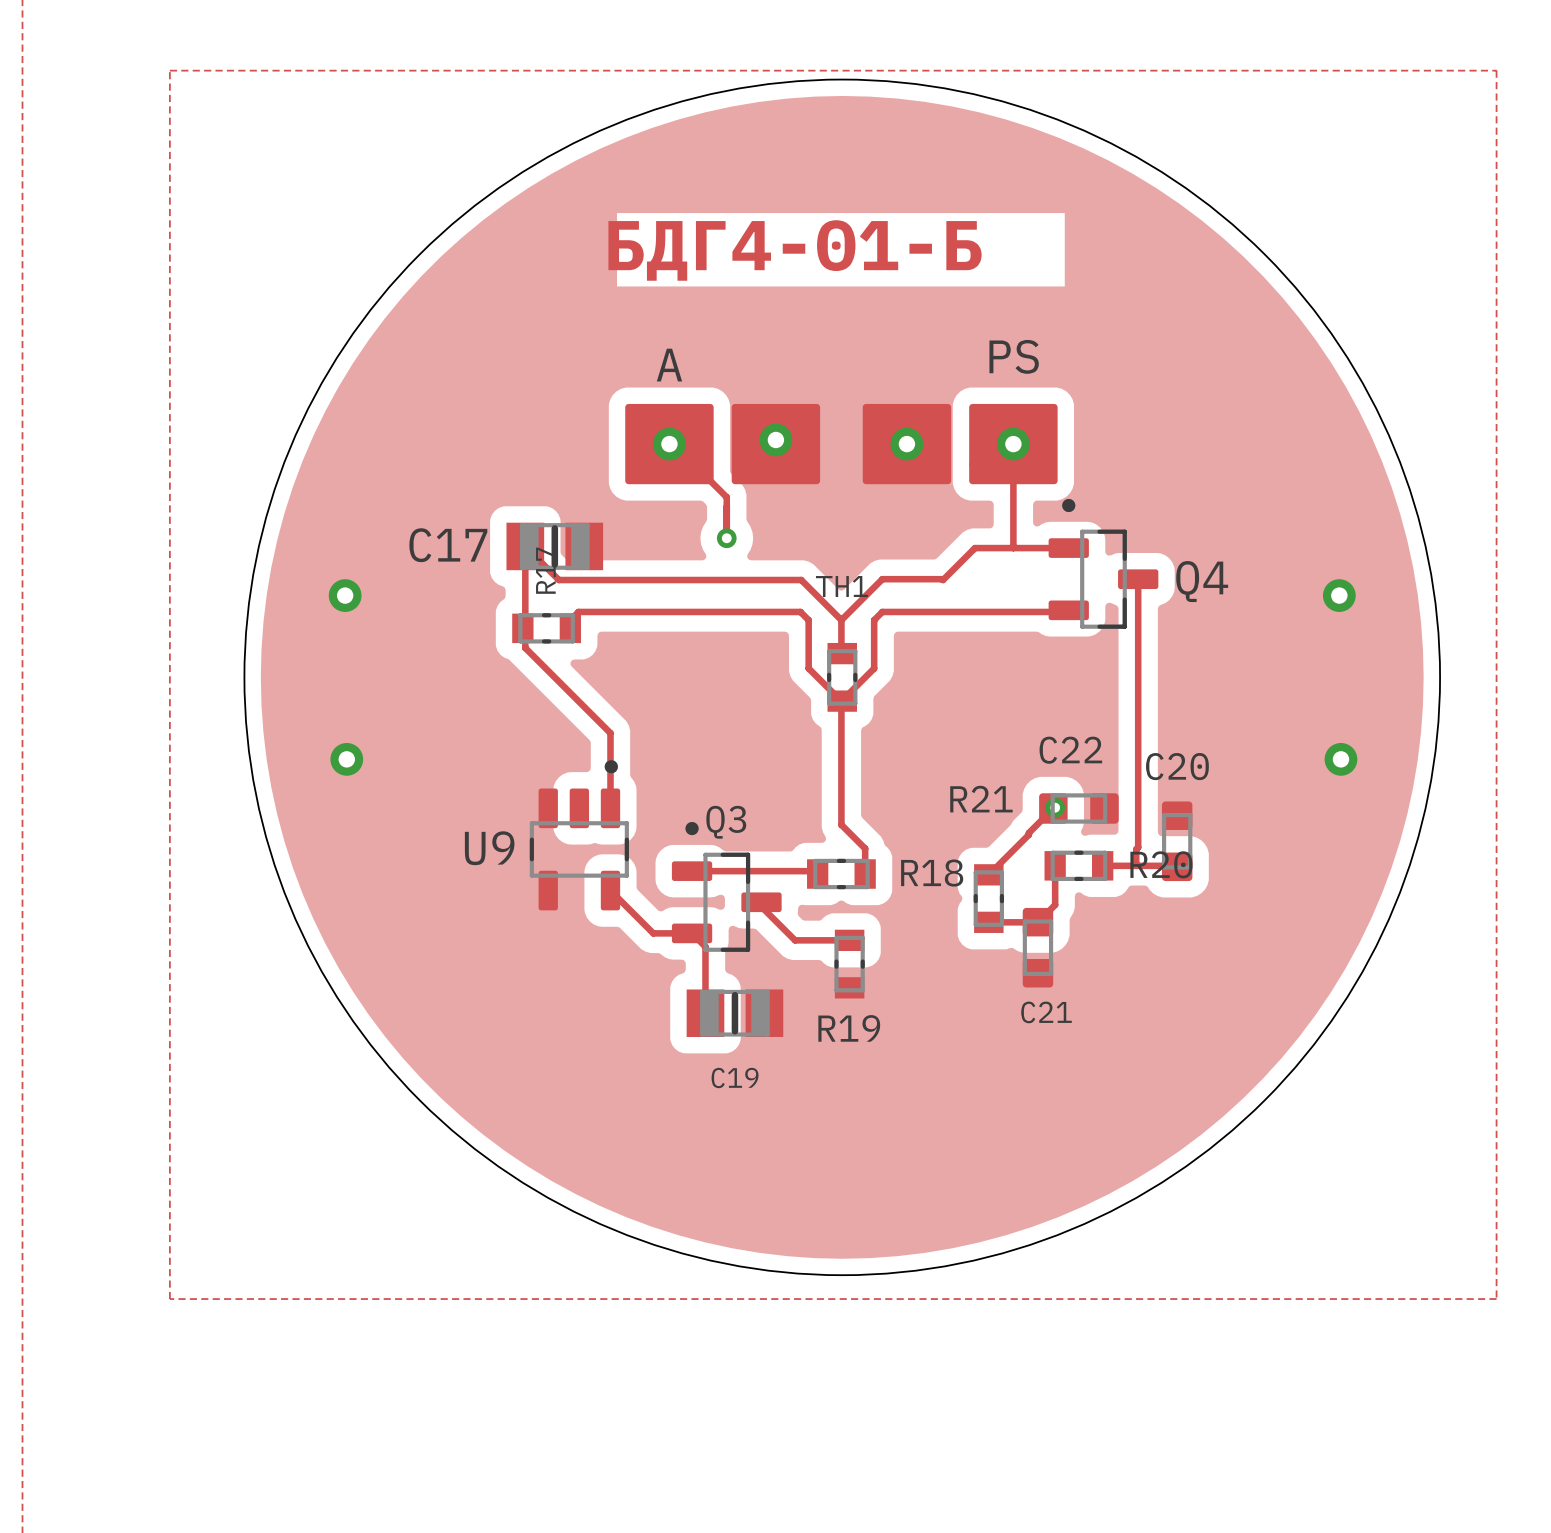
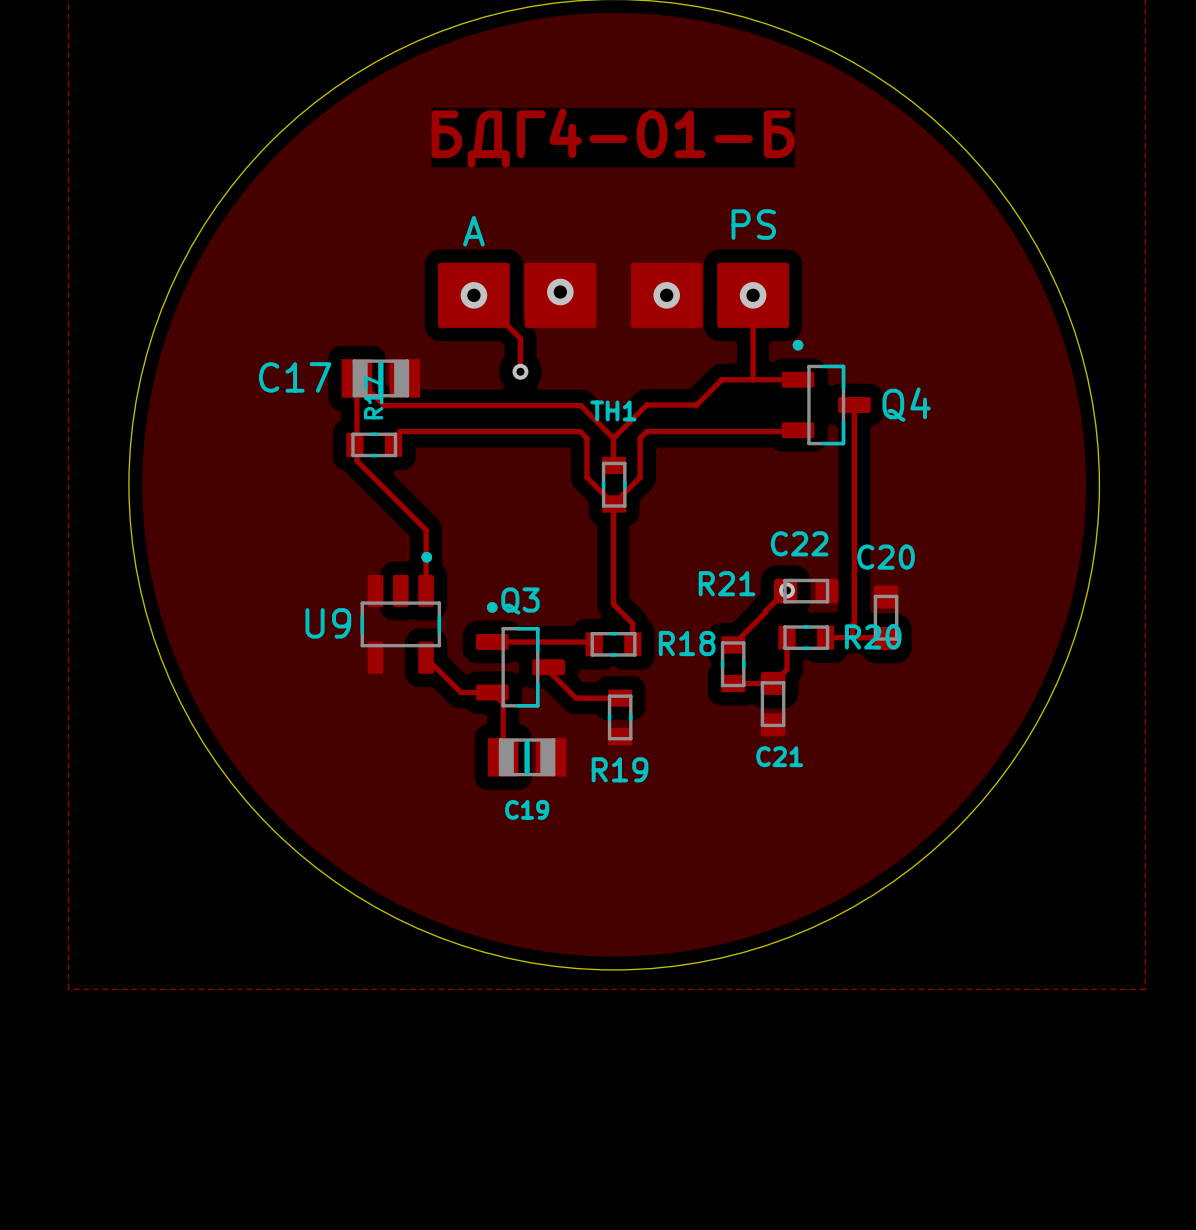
via: (345, 595) -> none
via: (1339, 595) -> none
via: (346, 759) -> none
via: (1340, 759) -> none

